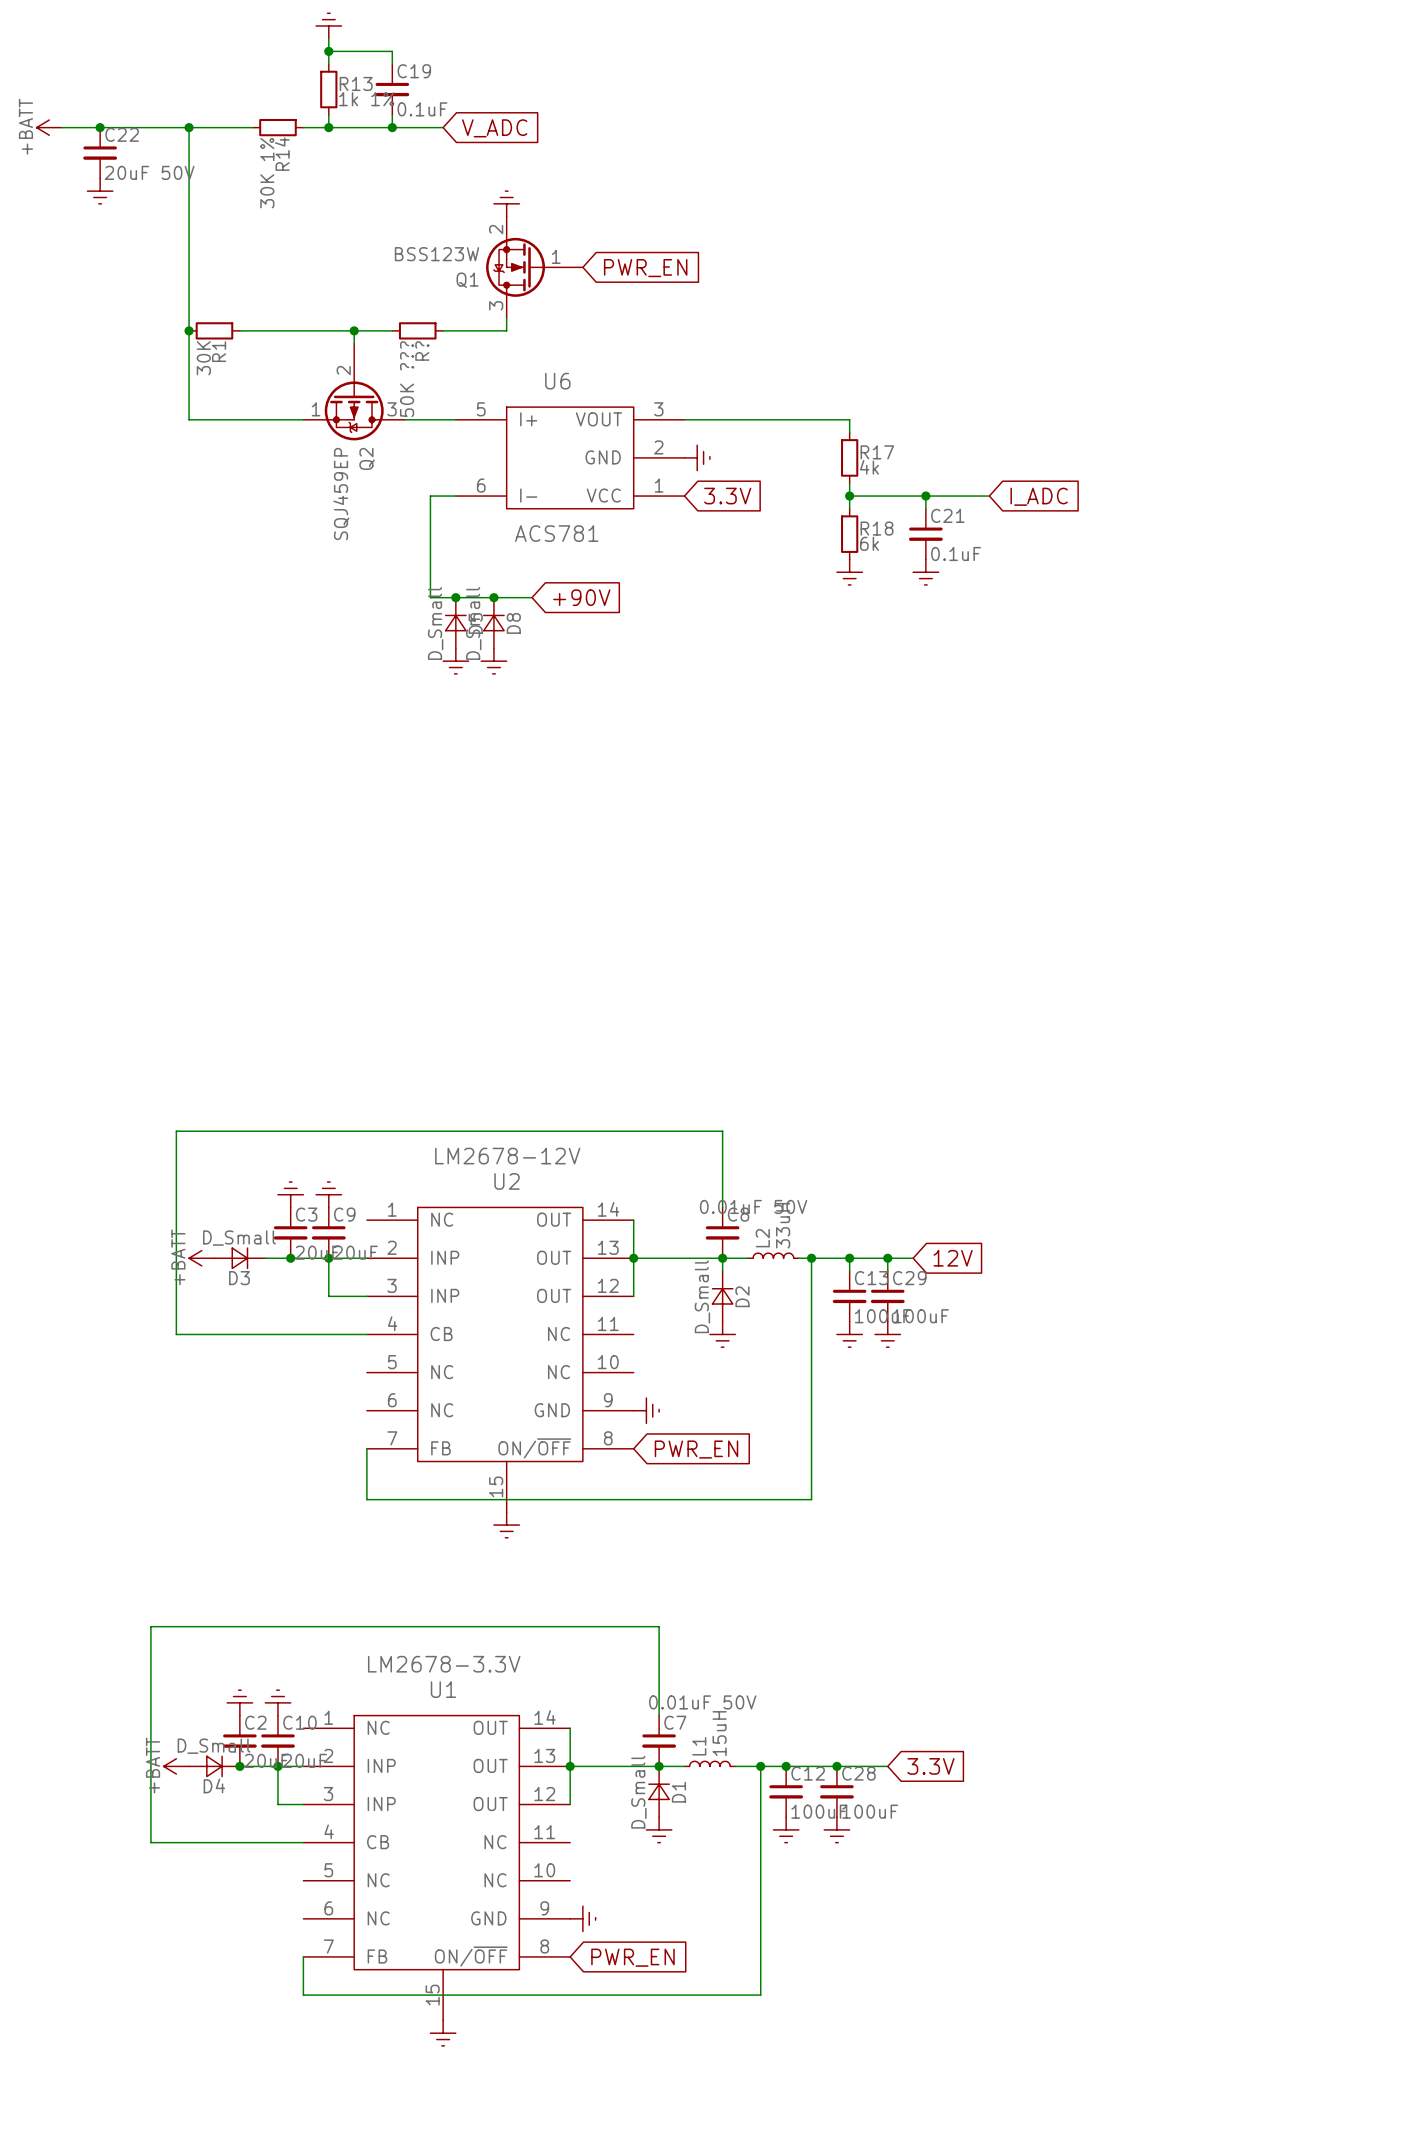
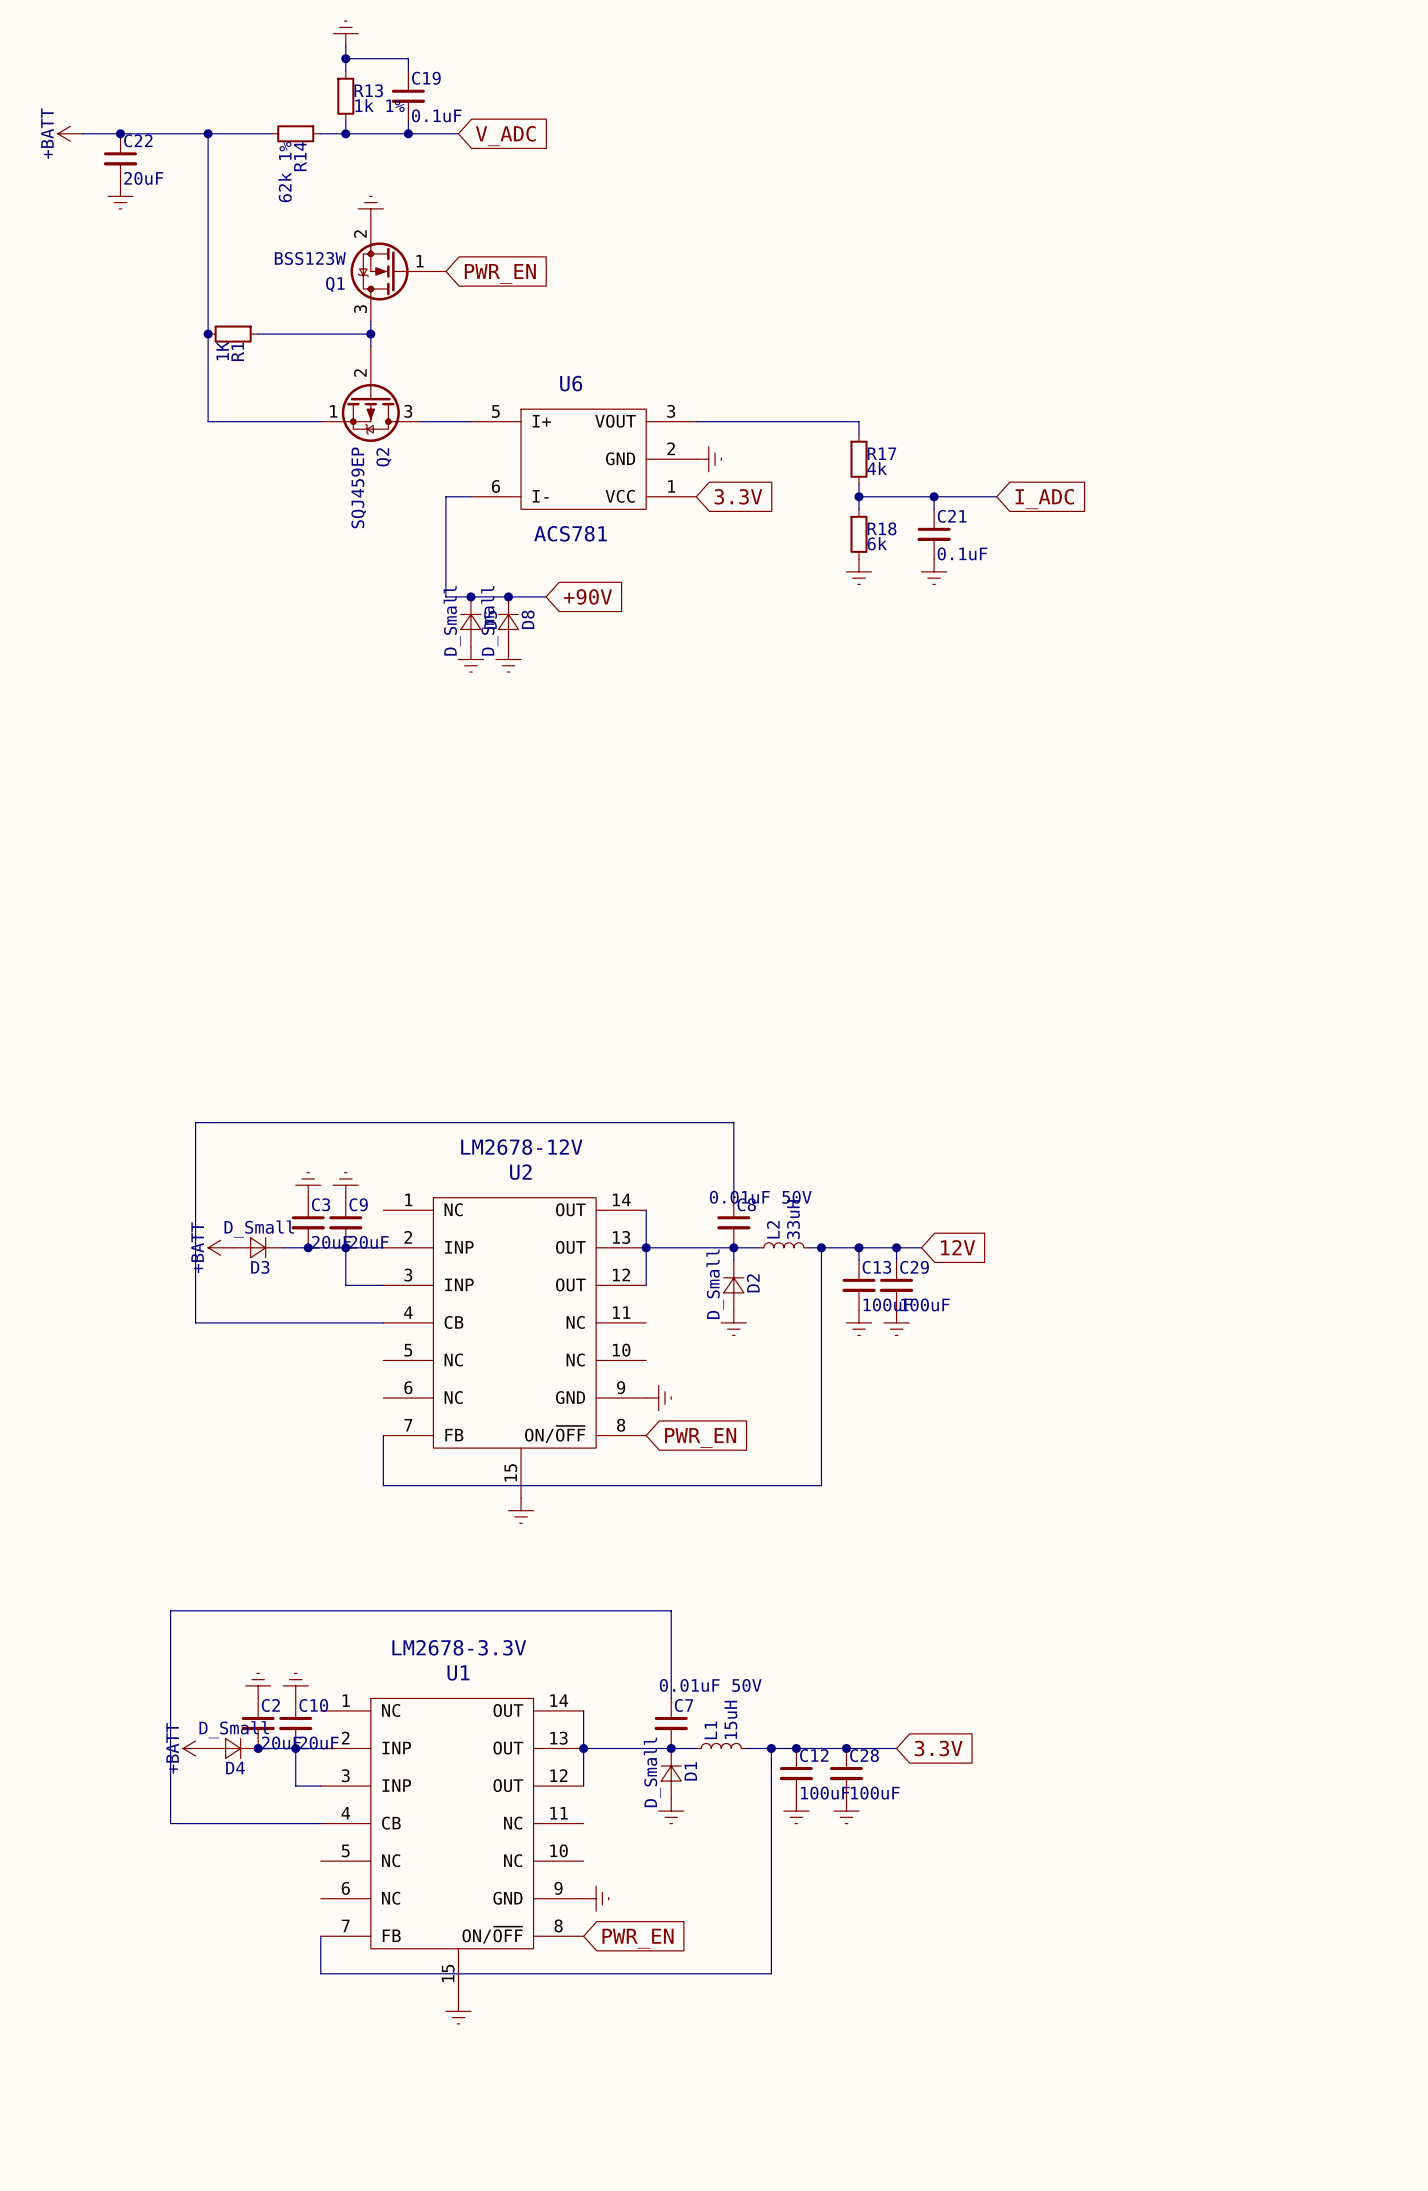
C22 value: 20uF 50V (149, 172) -> 20uF (143, 178)
R14 value: 30K 1% (267, 173) -> 62k 1% (285, 171)
power symbol position: (506, 203) -> (370, 208)
Q1 position: (534, 267) -> (398, 271)
global label position: PWR_EN (645, 268) -> PWR_EN (500, 273)
wire: (506, 318) (506, 330) (443, 330) -> none
wire: (354, 330) (392, 330) -> (370, 334) (370, 321)
R?: 50K ??? (417, 330) -> none
R1 value: 30K (203, 358) -> 1K (222, 350)

